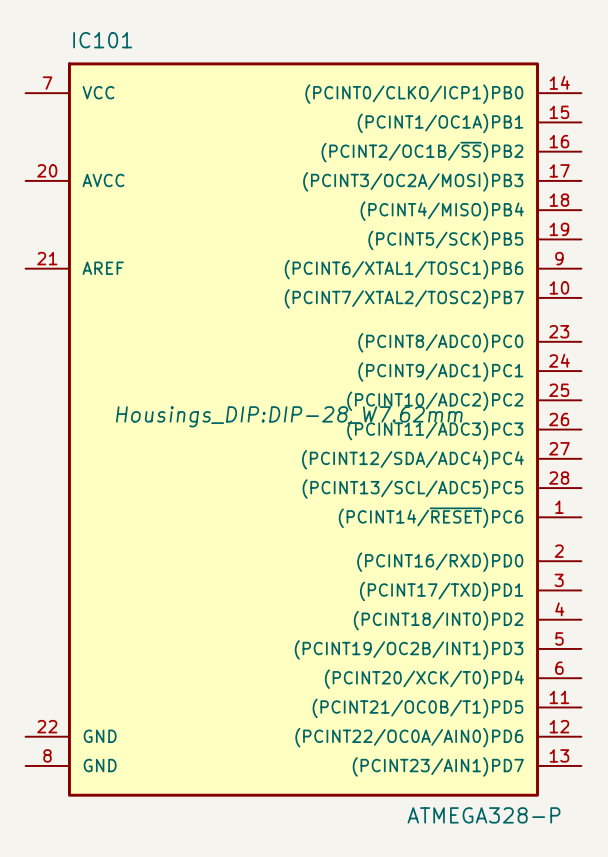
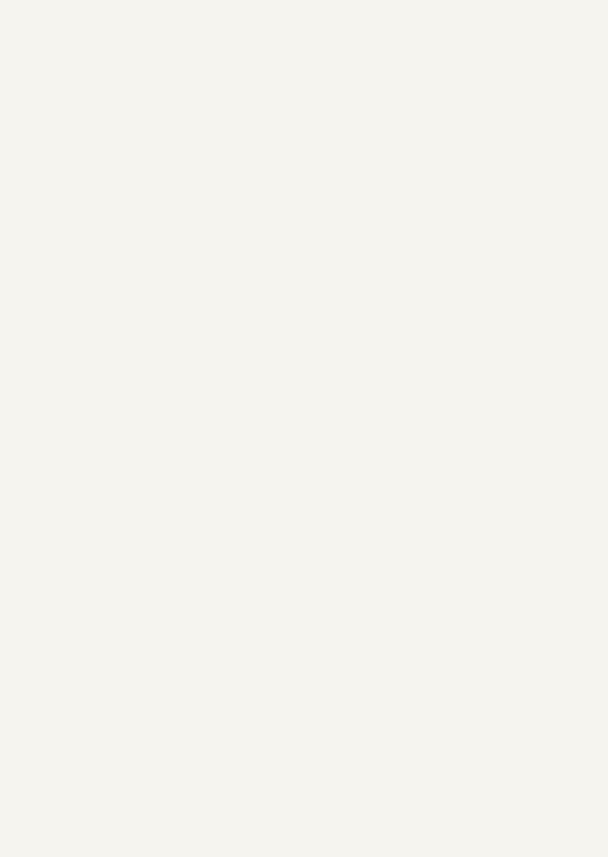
IC101: ATMEGA328-P (303, 429) -> none

